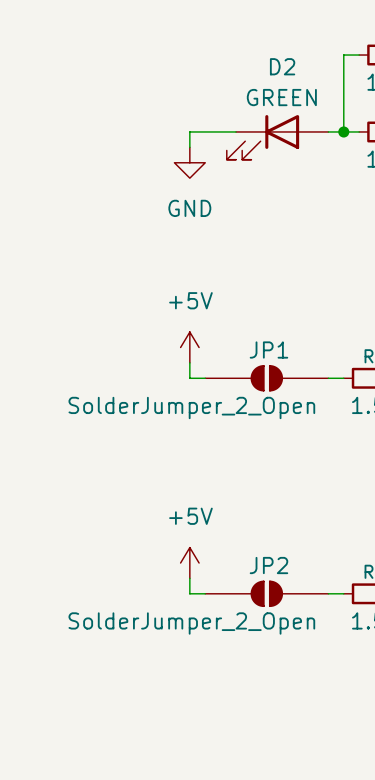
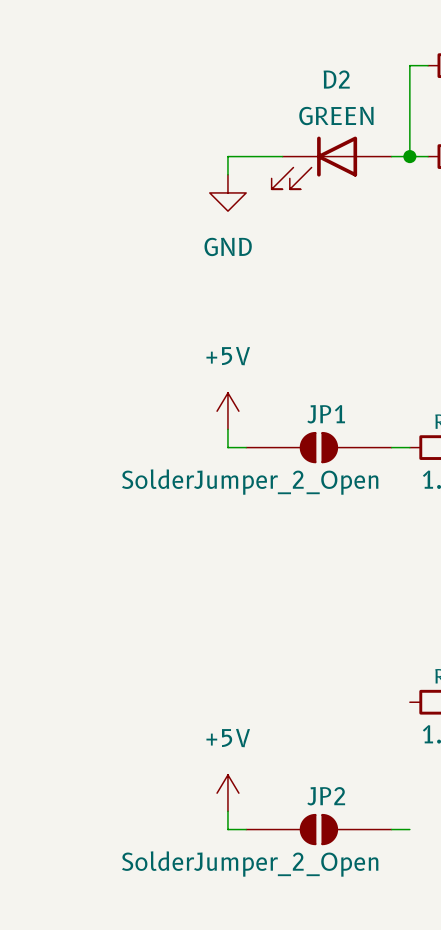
power symbol position: +5V (189, 563) -> +5V (227, 793)
wire: (189, 578) (189, 593) (205, 593) -> (227, 811) (227, 829) (246, 829)
JP2 position: (266, 593) -> (318, 829)
wire: (328, 593) (343, 593) -> (391, 829) (409, 829)

